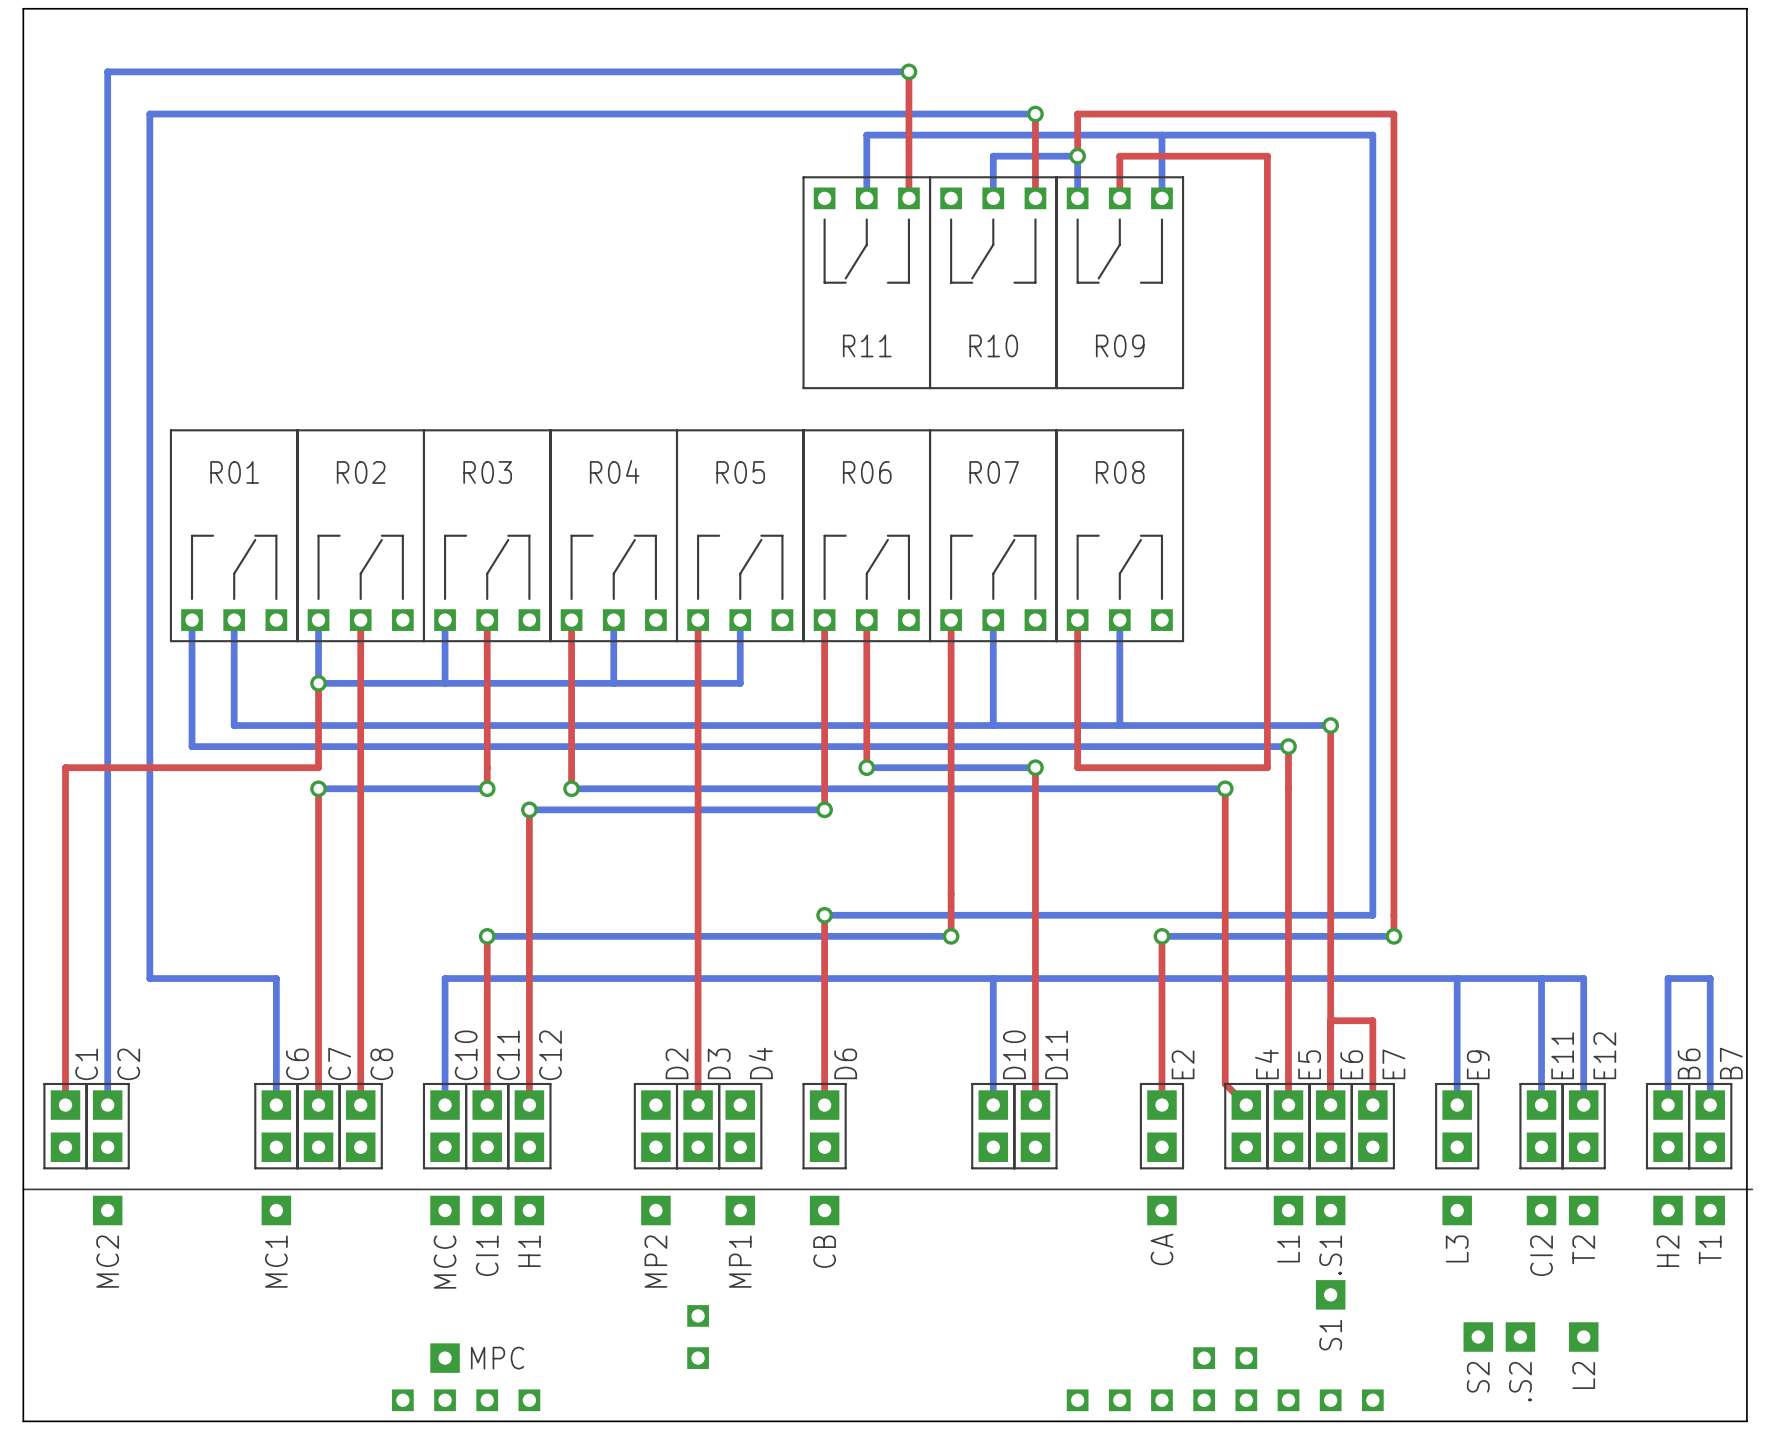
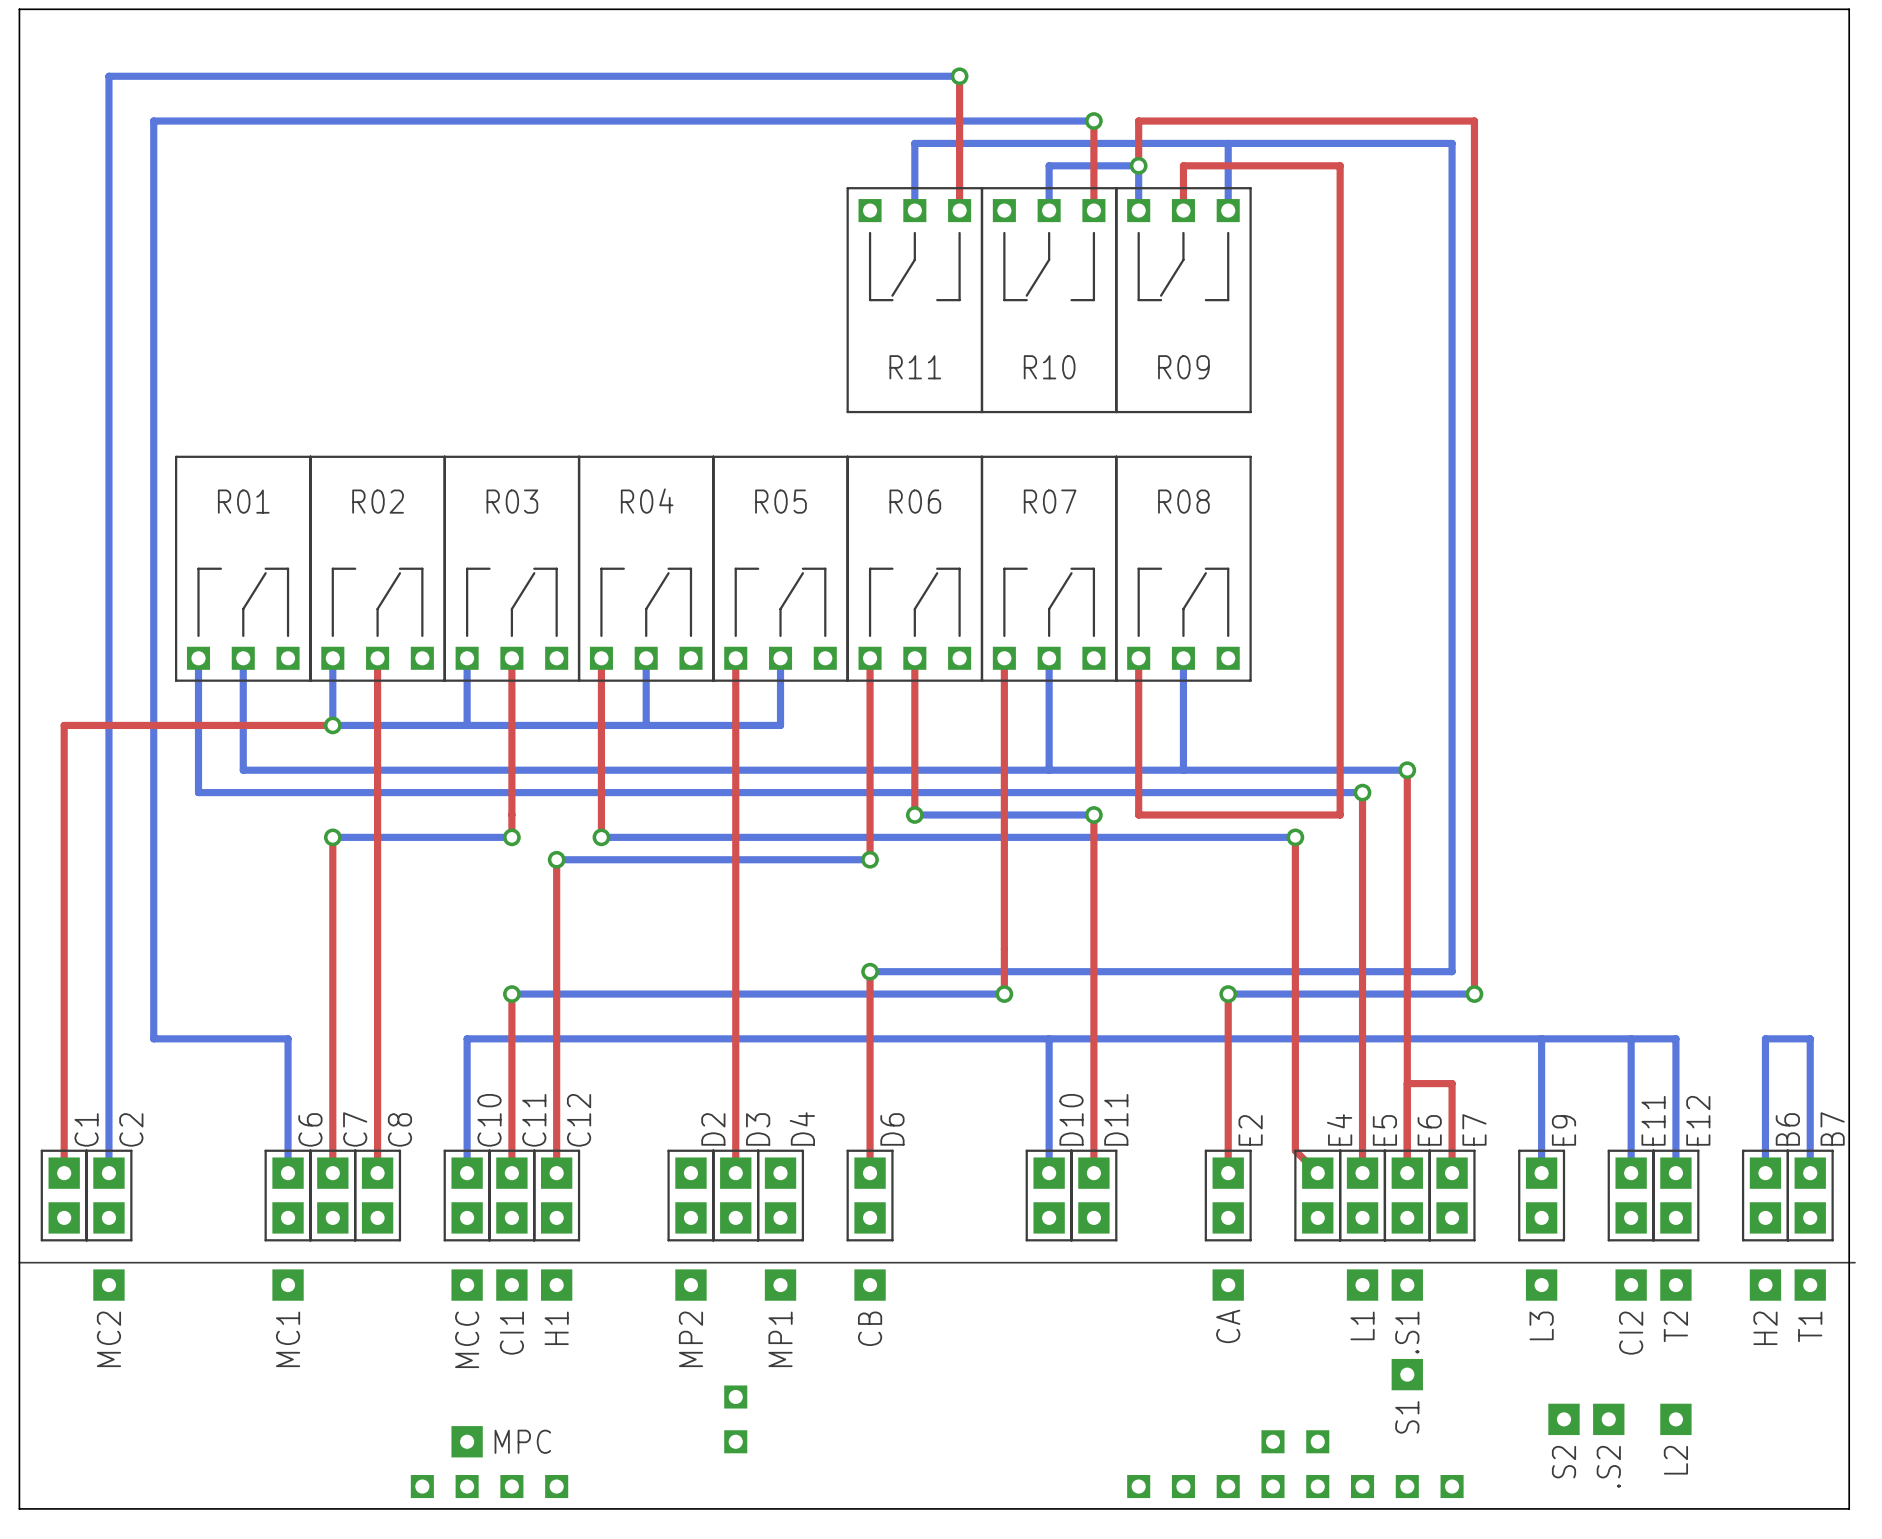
top track: (318, 683) (318, 767) (65, 767) -> (332, 725) (64, 725) (64, 814)

